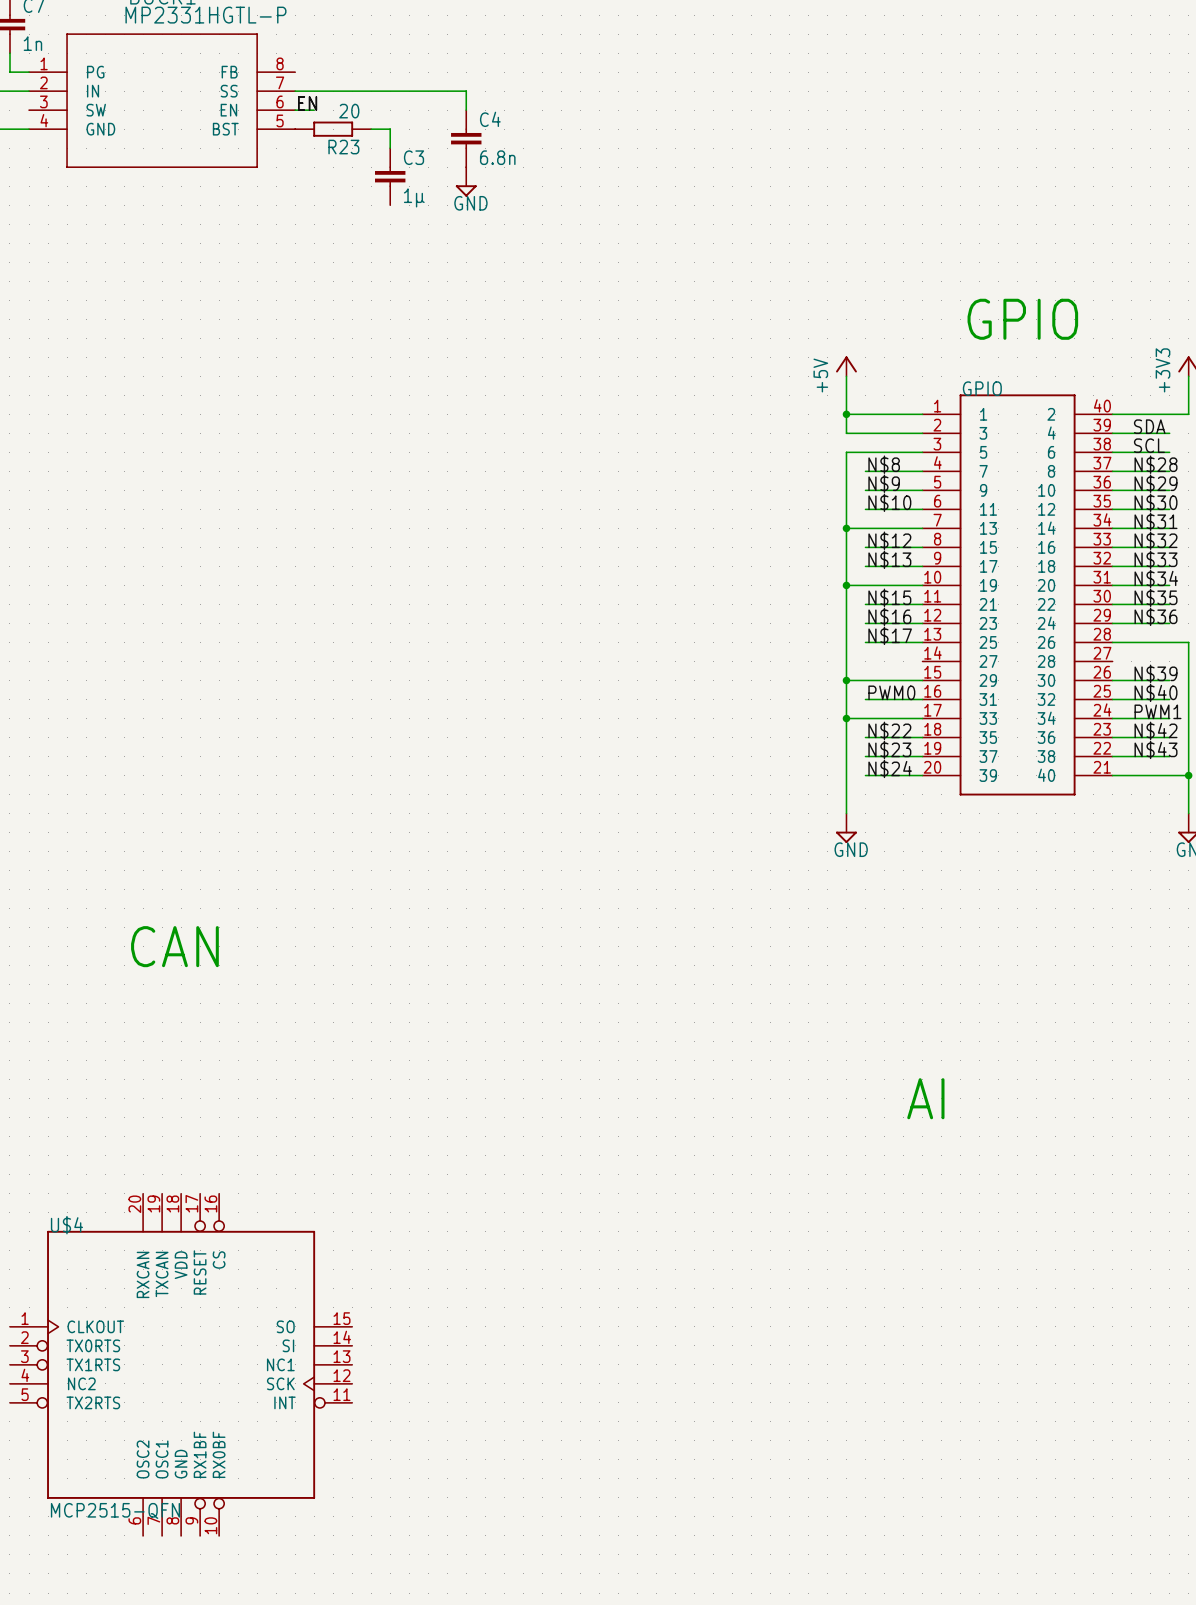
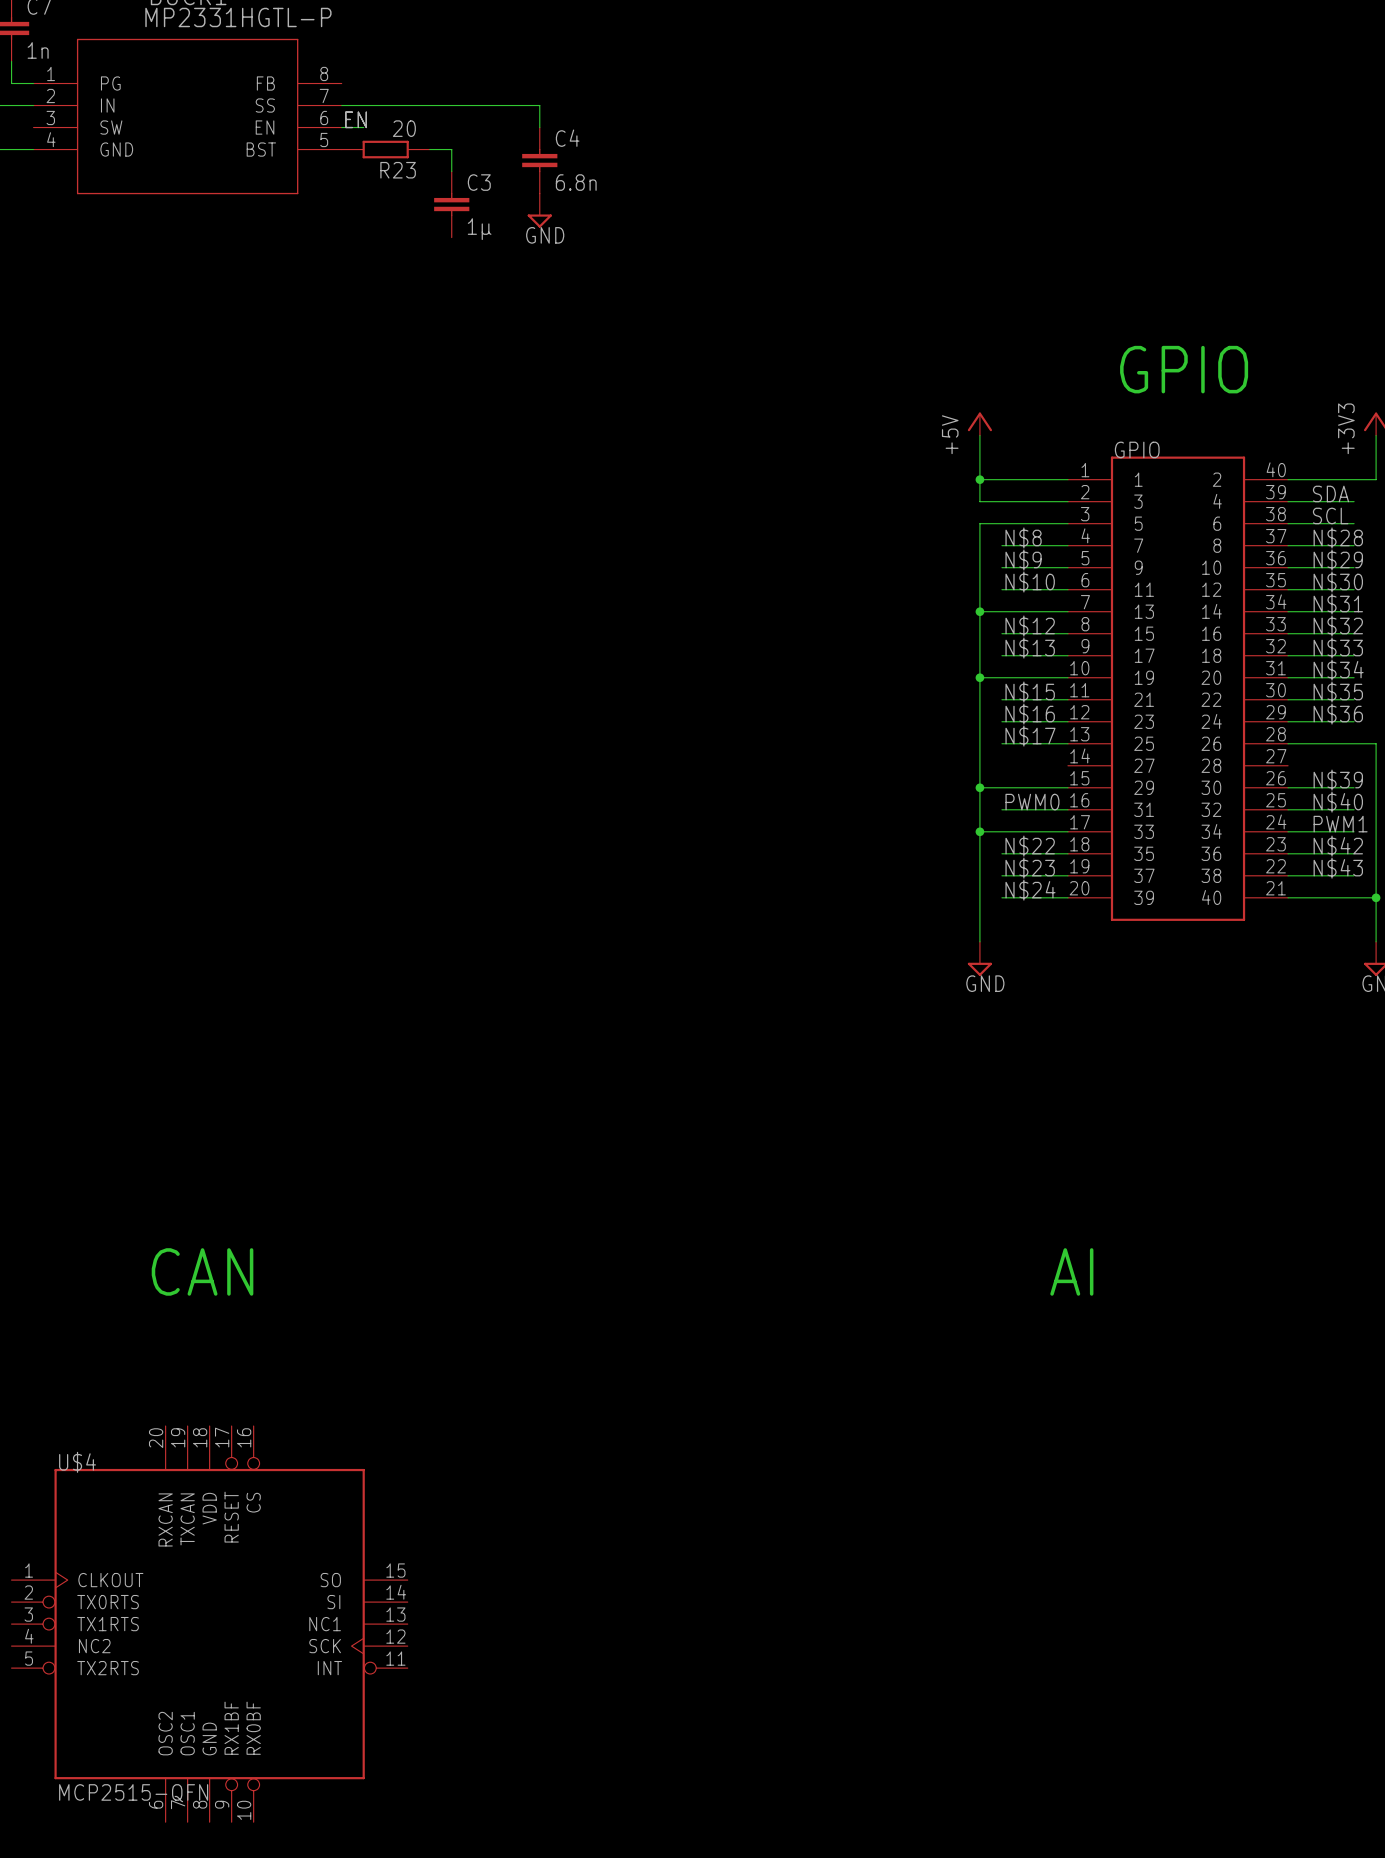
text position: CAN (174, 946) -> CAN (202, 1271)
U$4 position: (181, 1364) -> (209, 1624)

